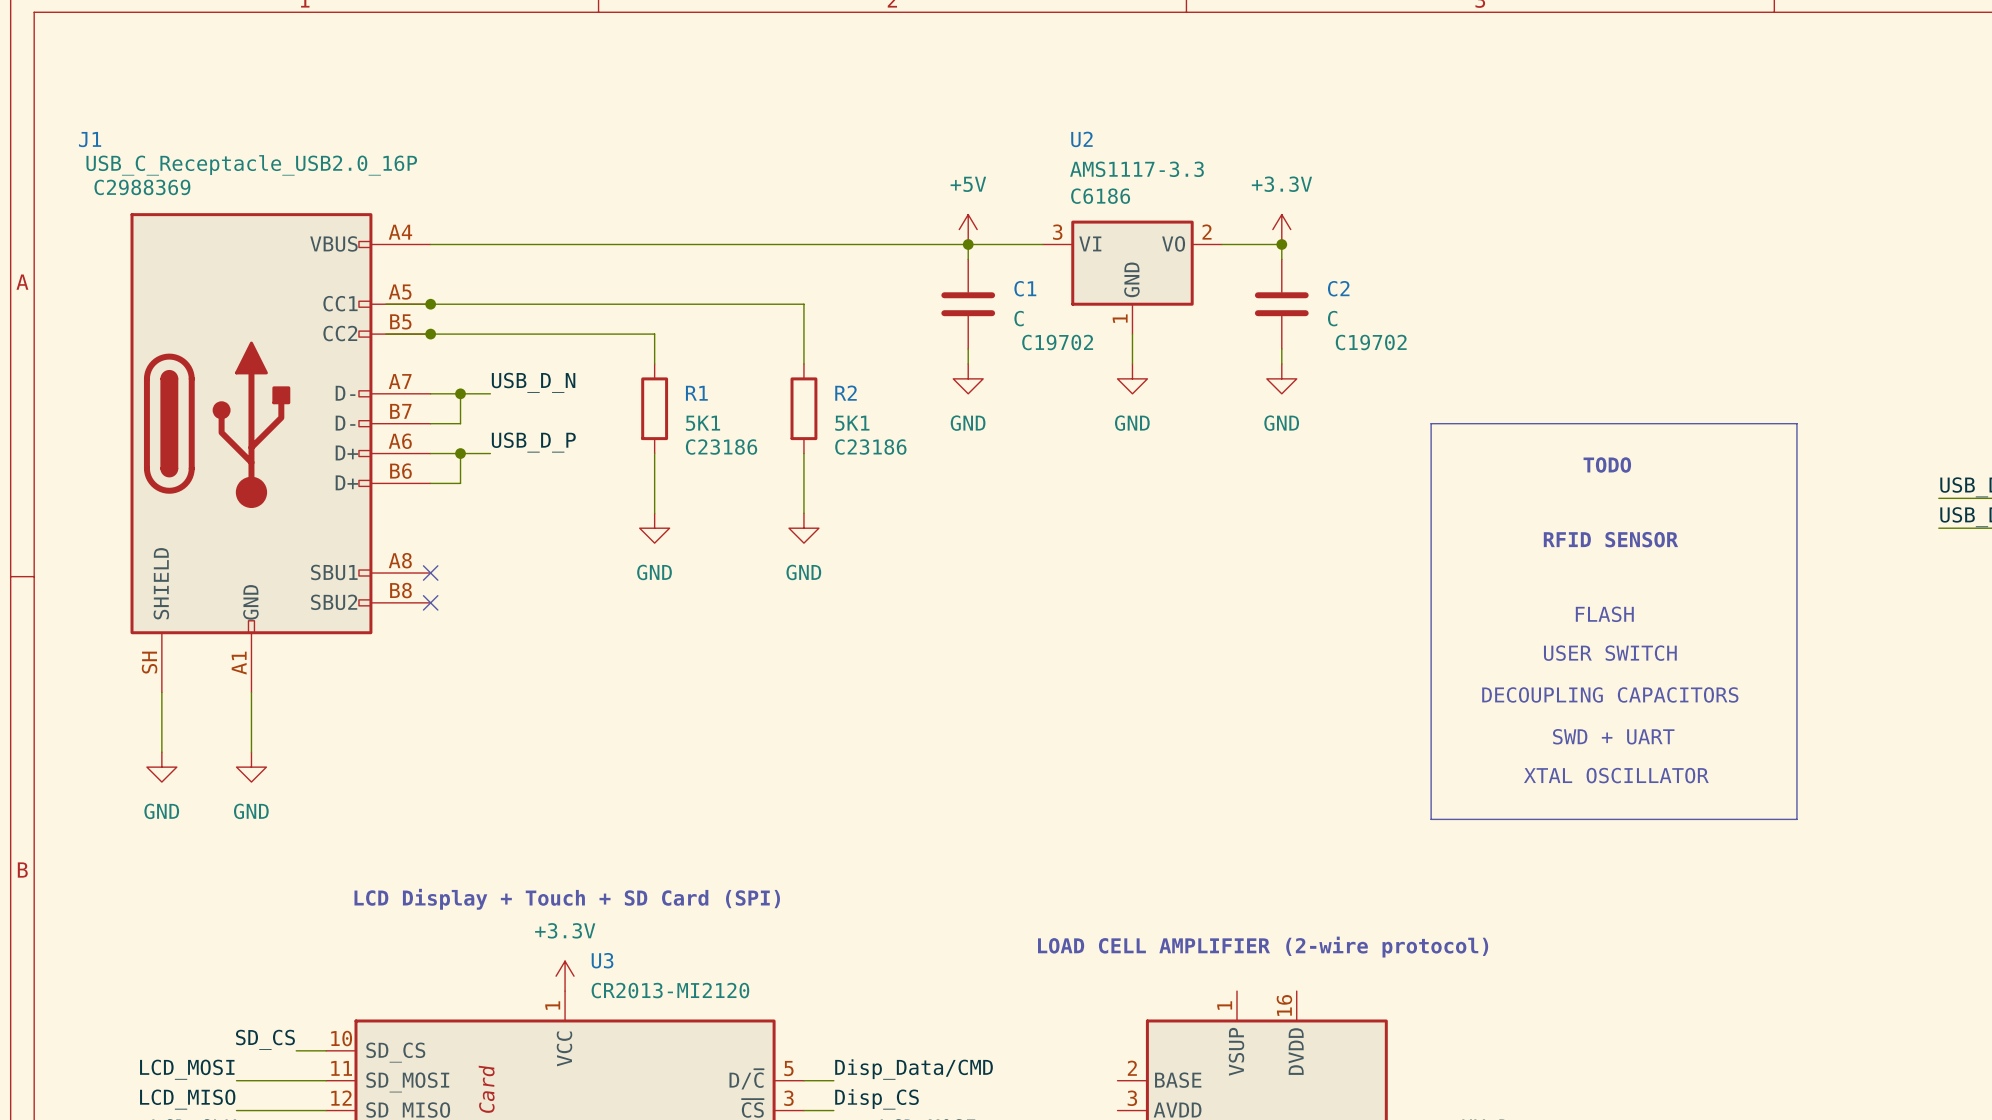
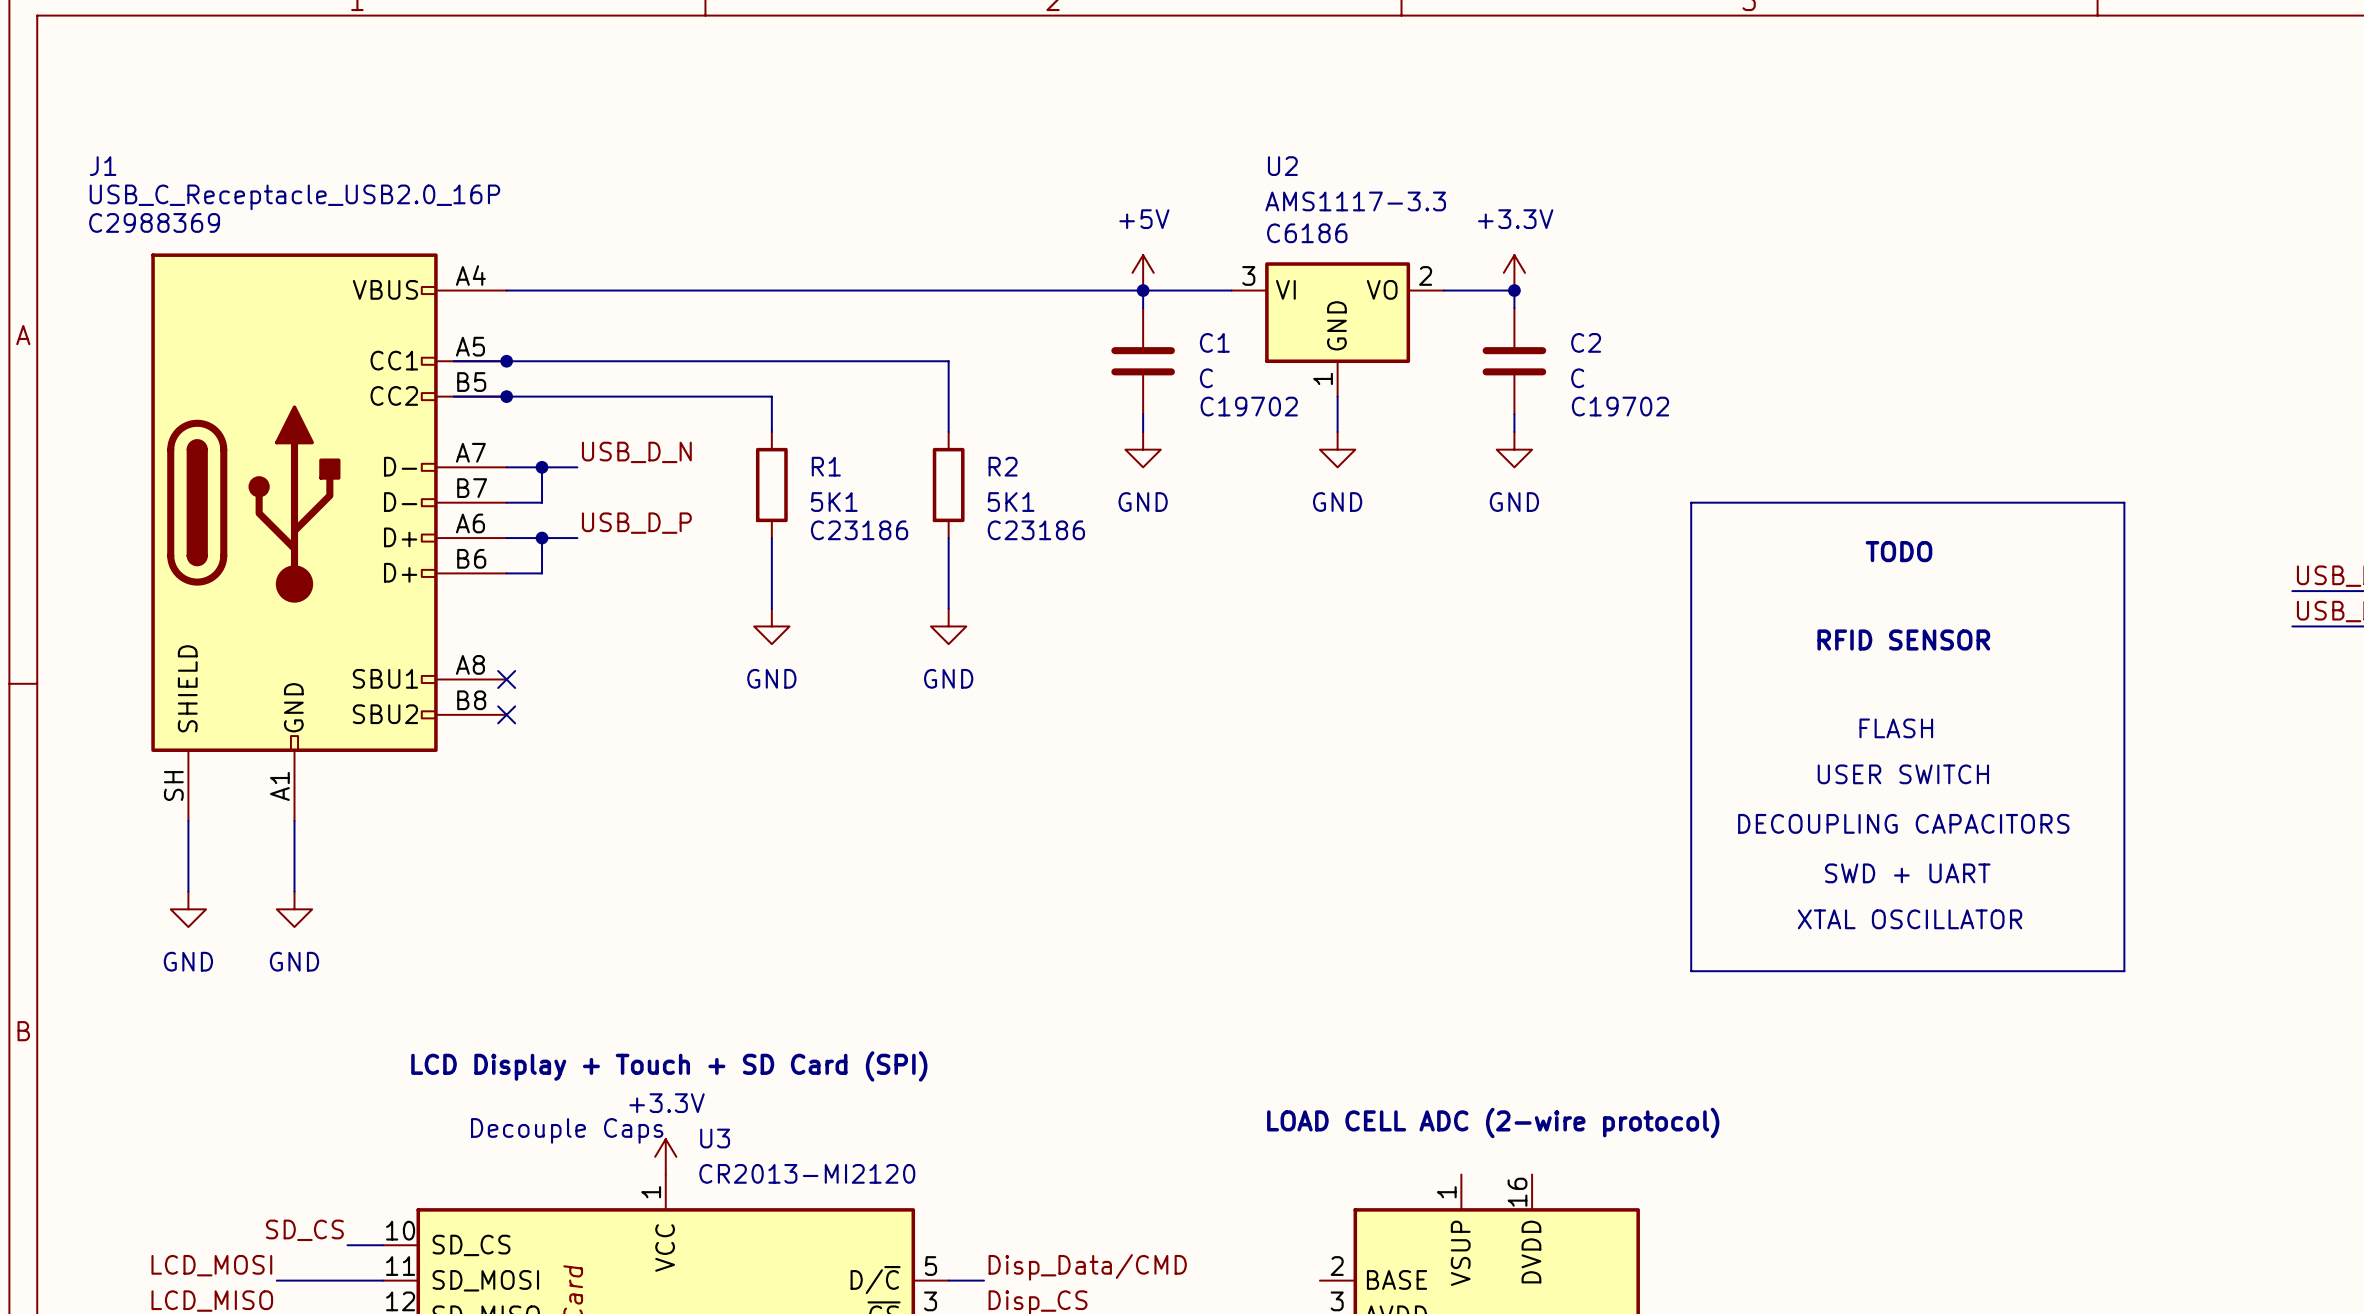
text: LOAD CELL AMPLIFIER (2-wire protocol) (1263, 947) -> LOAD CELL ADC (2-wire protocol) (1493, 1122)
text: none -> Decouple Caps (567, 1130)

